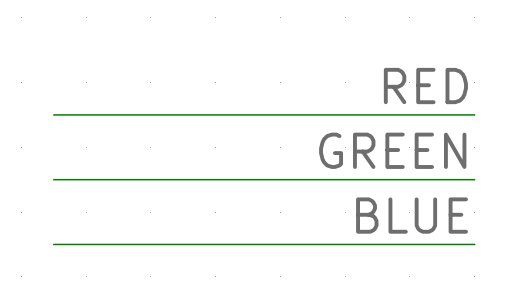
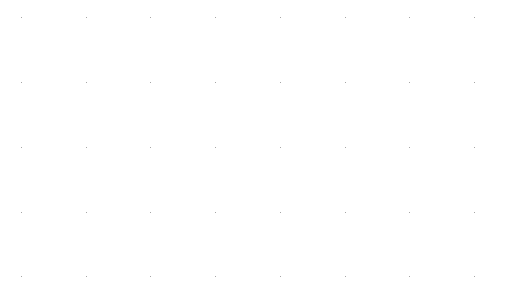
label: RED (425, 86) -> none
wire: (53, 114) (474, 114) -> none
label: GREEN (392, 150) -> none
wire: (53, 179) (474, 179) -> none
label: BLUE (412, 215) -> none
wire: (53, 244) (474, 244) -> none

